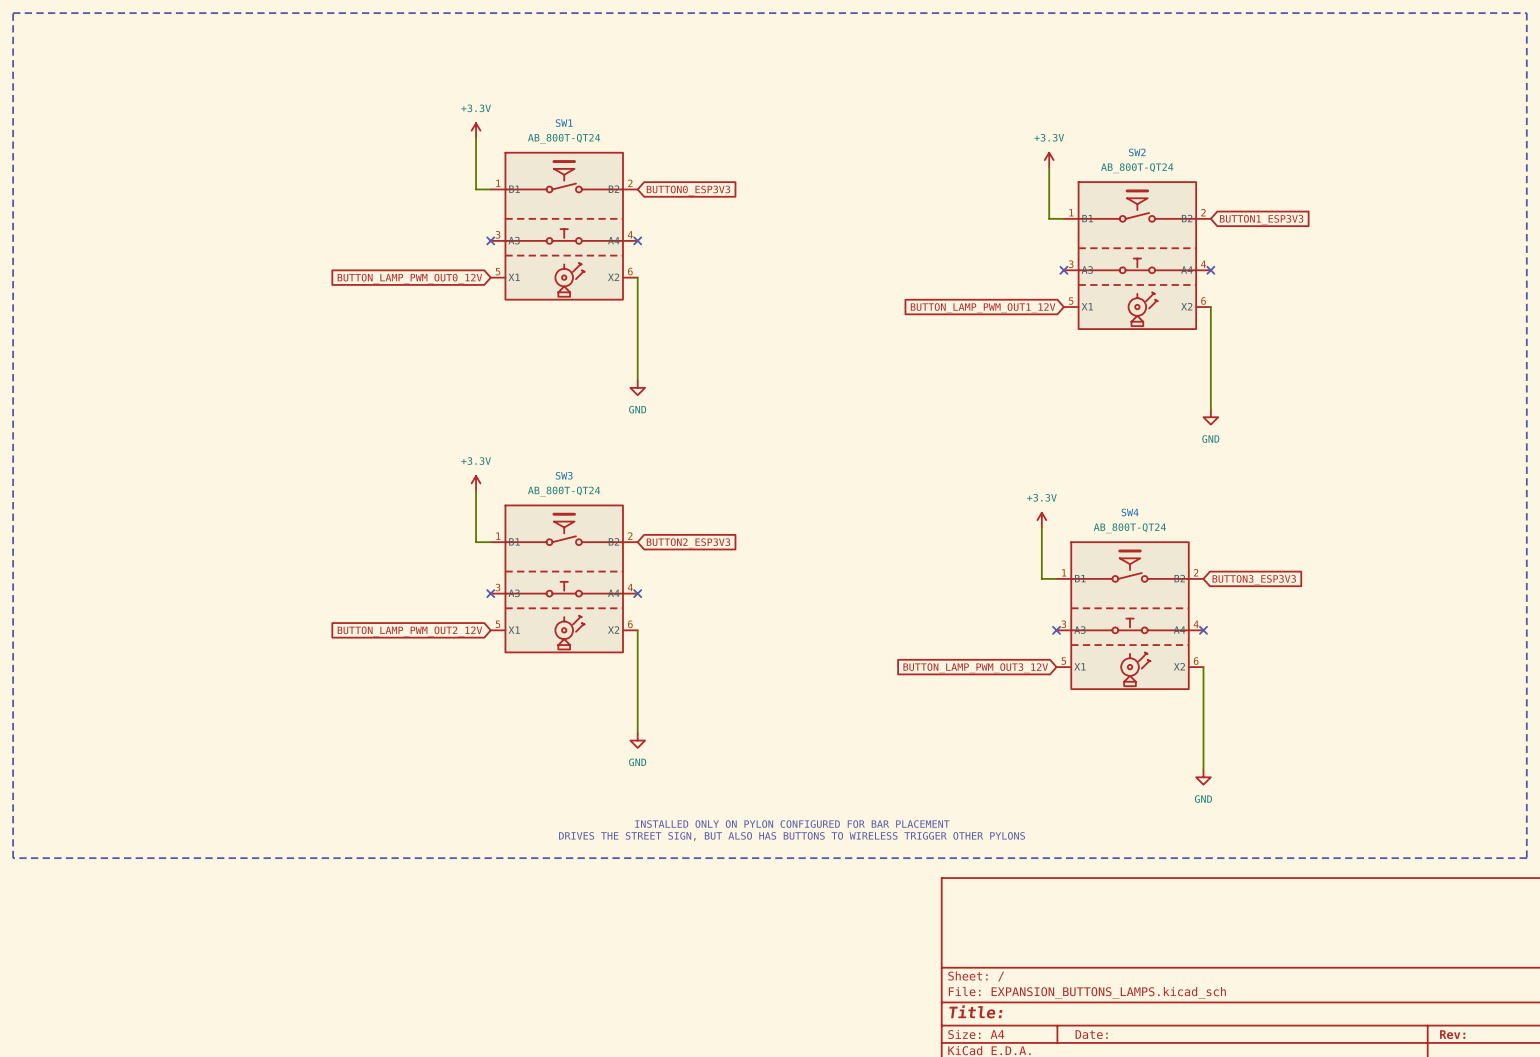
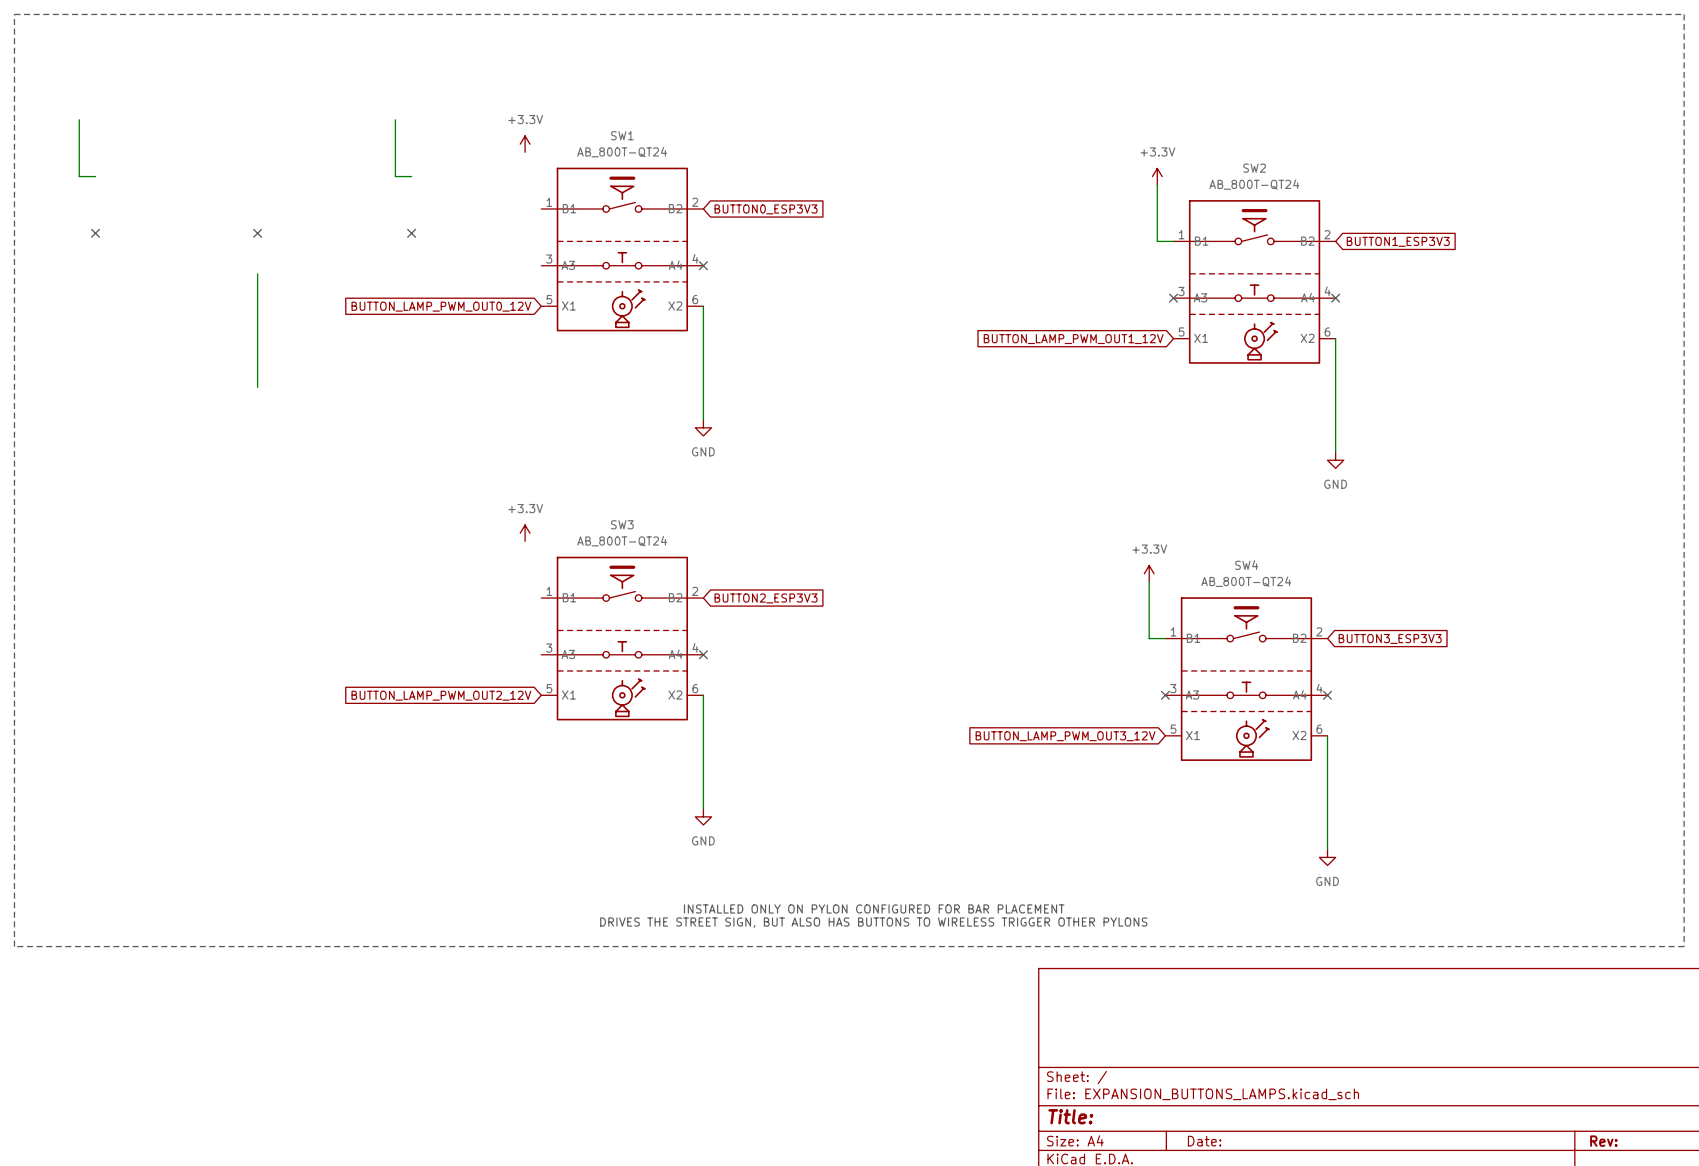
wire: none -> (79, 119) (79, 176) (95, 176)
wire: (476, 138) (476, 189) (490, 189) -> (395, 119) (395, 176) (411, 176)
no-connect mark: none -> (95, 233)
no-connect mark: none -> (257, 233)
no-connect mark: none -> (411, 233)
no-connect mark: (490, 240) -> none
wire: none -> (257, 273) (257, 387)
wire: (476, 490) (476, 542) (490, 542) -> none
no-connect mark: (490, 593) -> none

